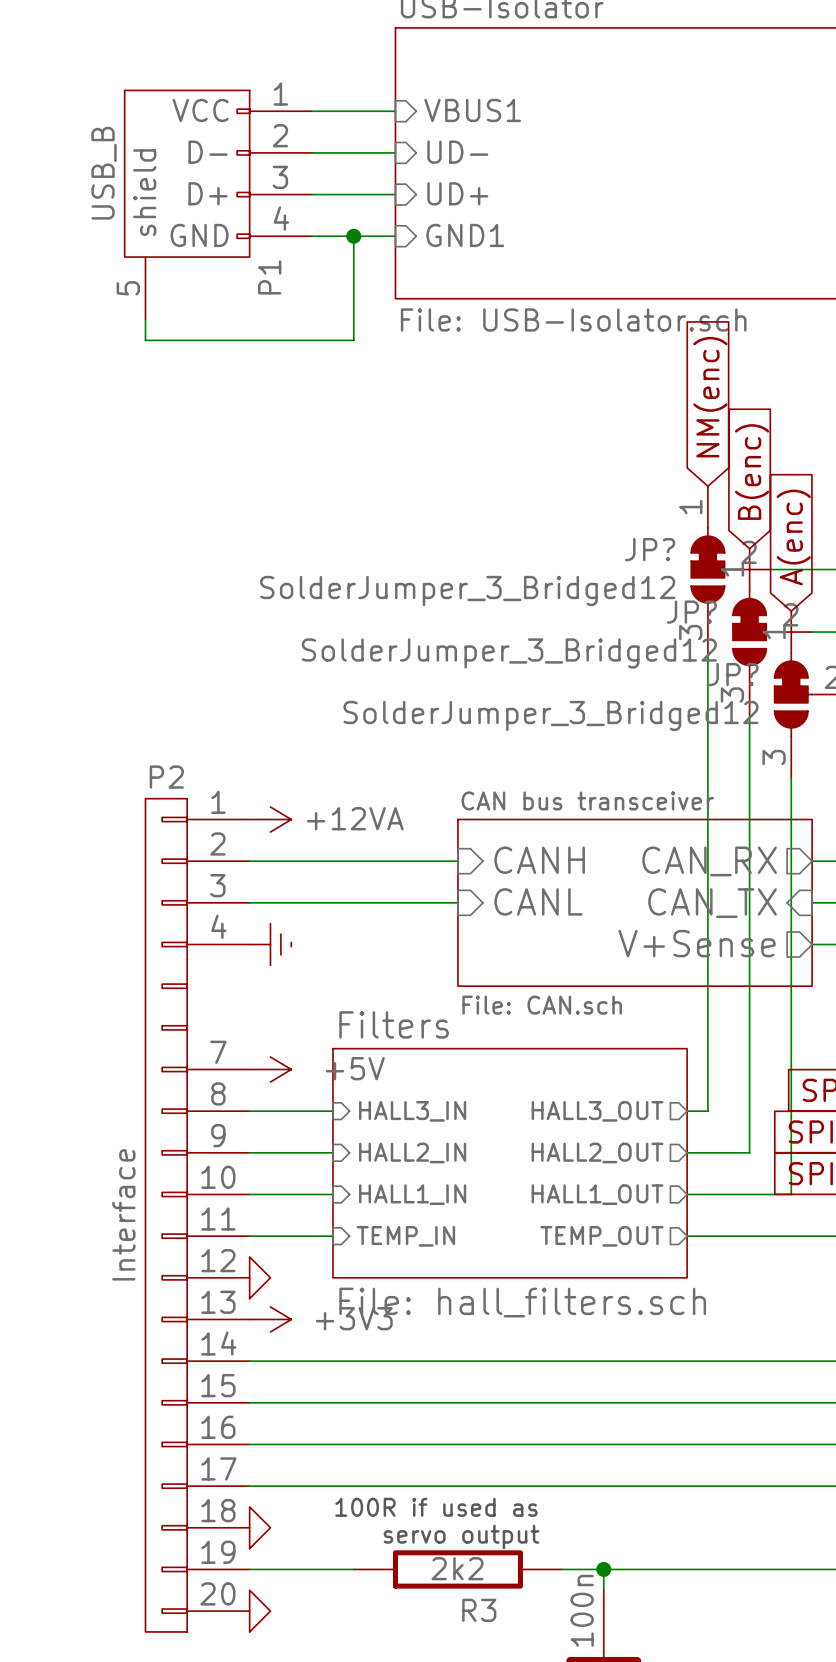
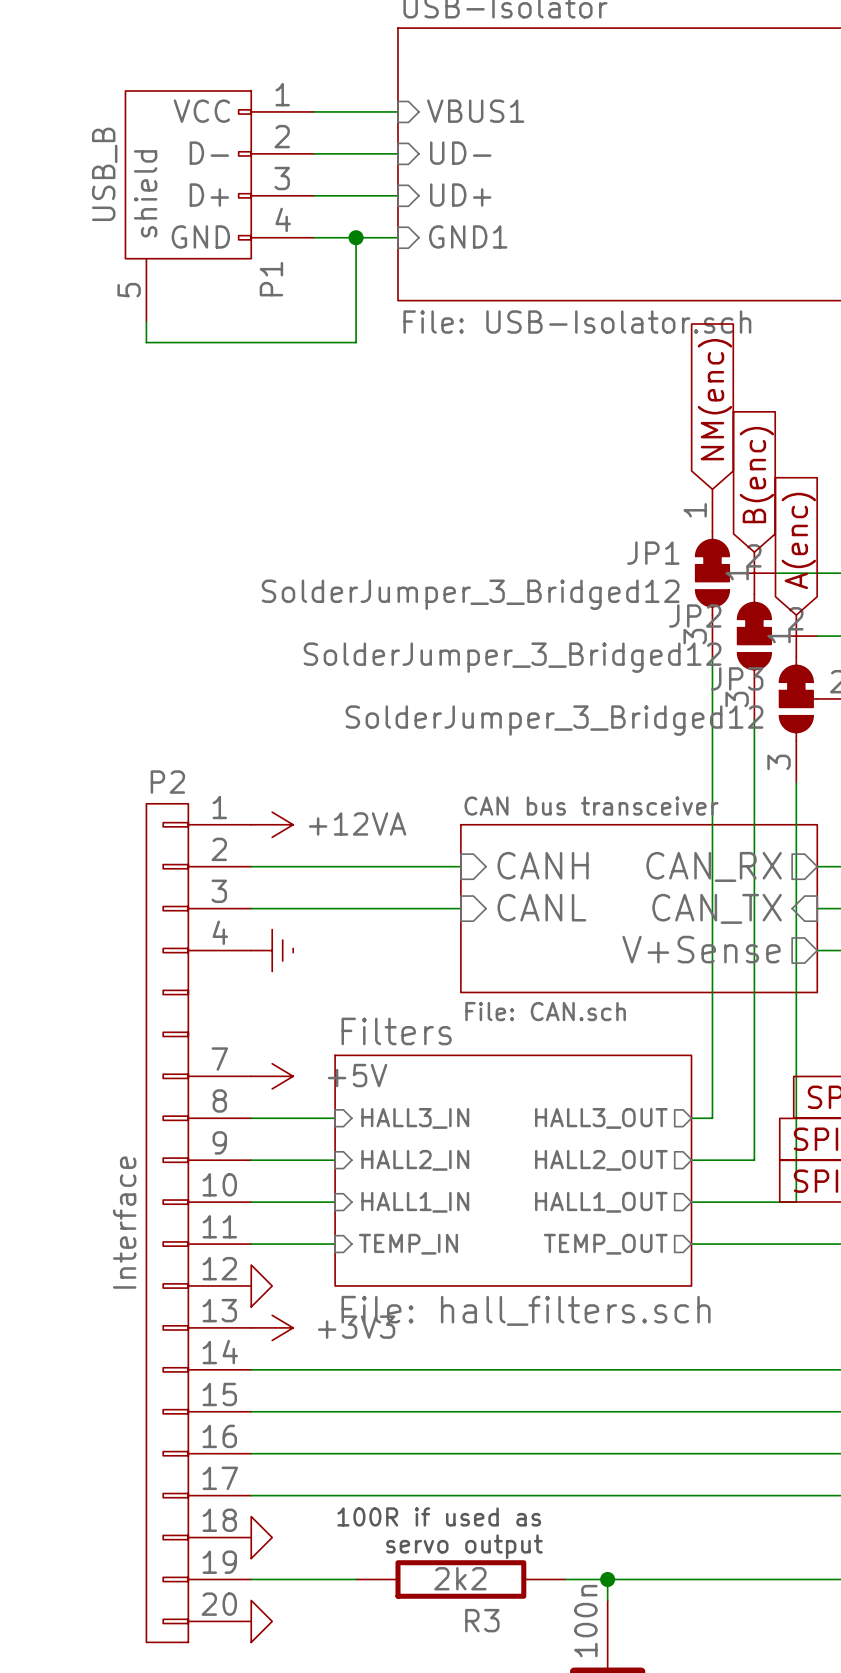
JP? name: JP? (650, 549) -> JP1 (653, 553)
JP? name: JP? (691, 612) -> JP2 (695, 616)
JP? name: JP? (733, 674) -> JP3 (737, 678)

